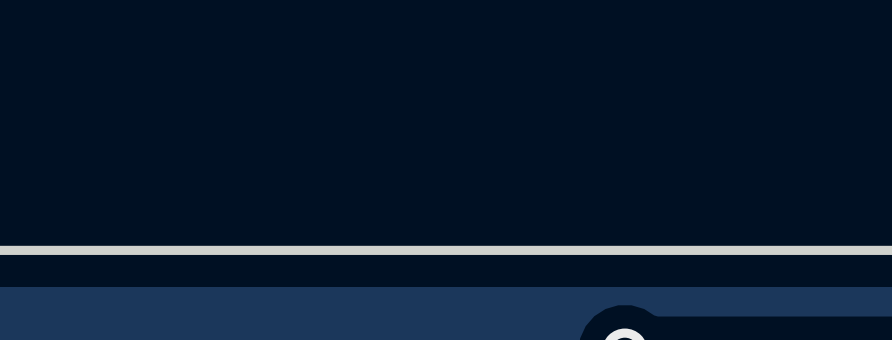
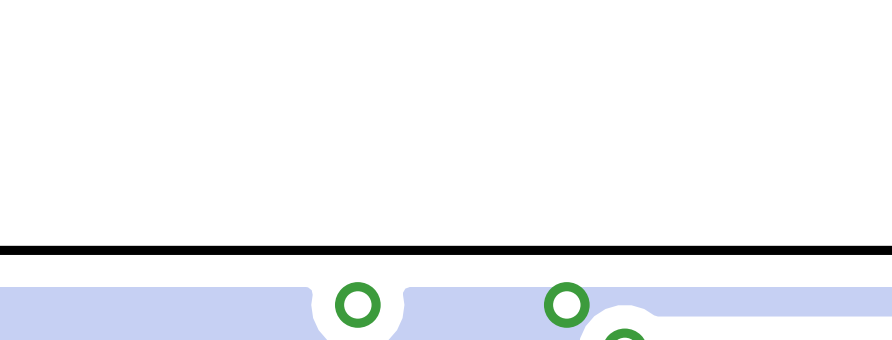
via: none -> (357, 304)
via: none -> (566, 304)

